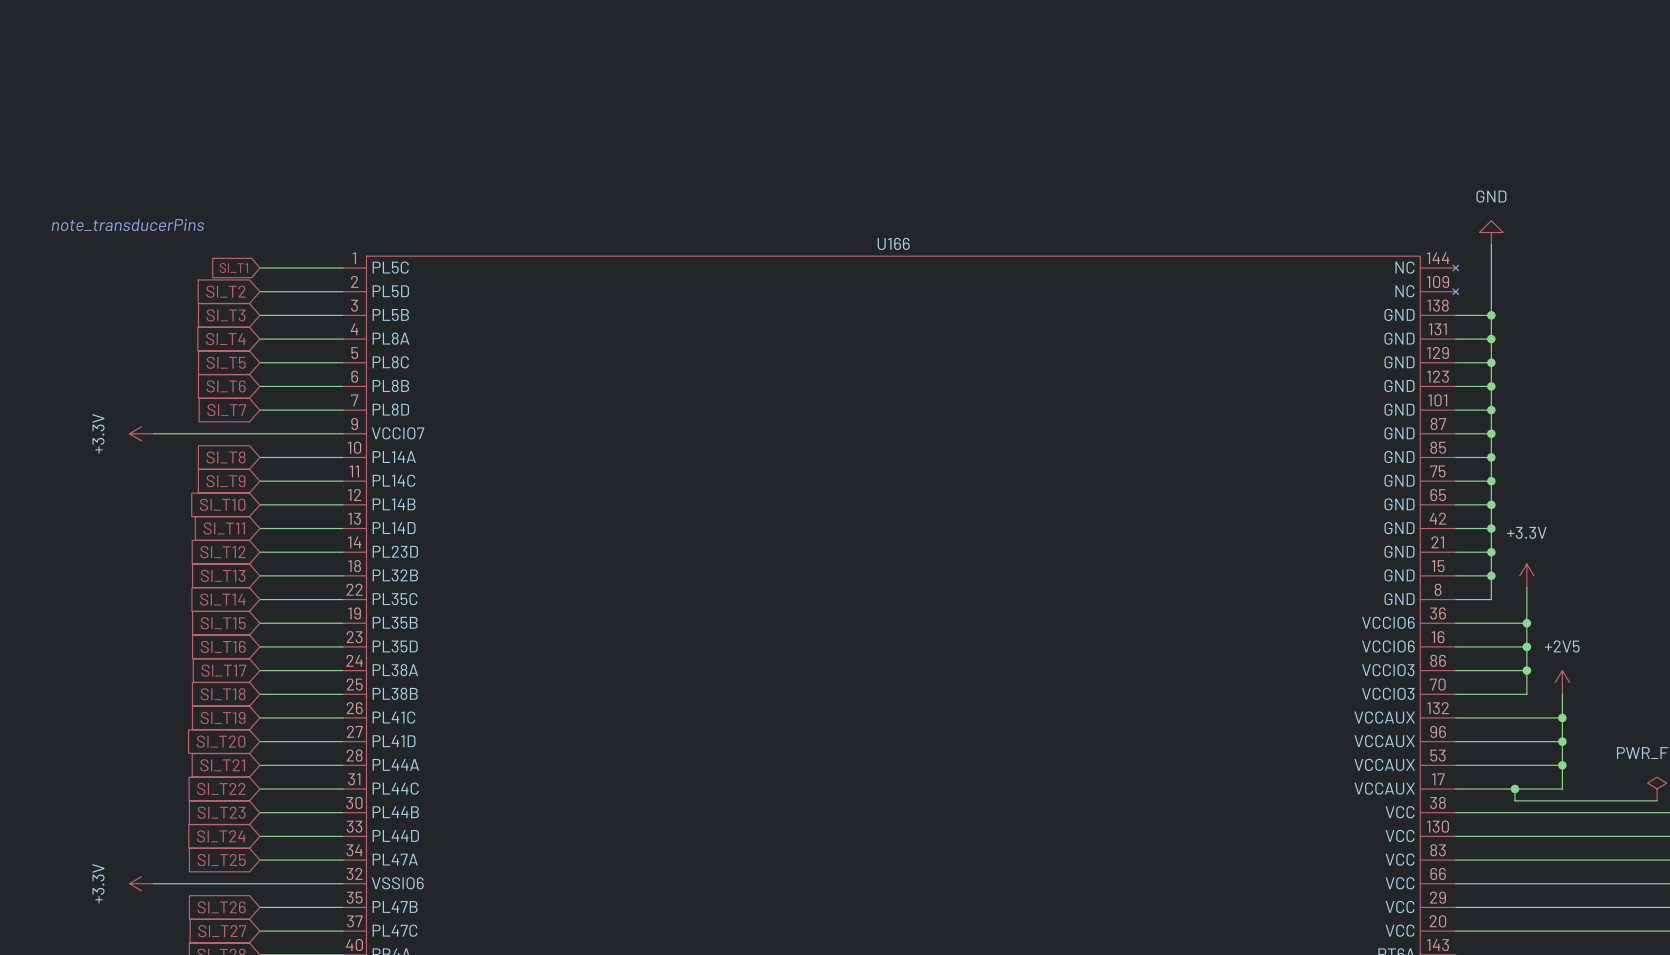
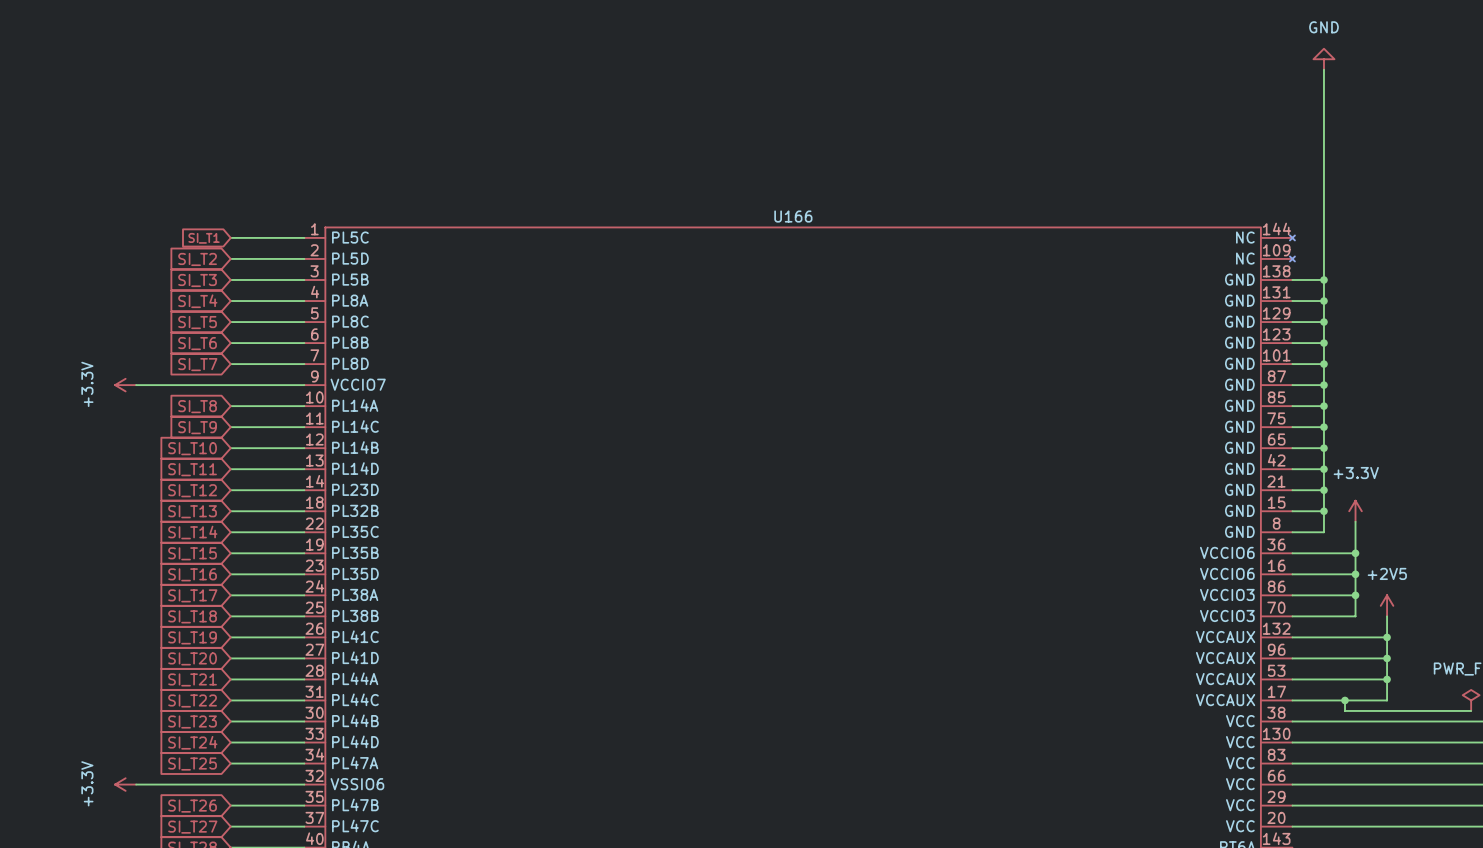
wire: none -> (1323, 69) (1323, 216)
text: note_transducerPins (127, 224) -> none
power symbol position: GND (1491, 232) -> GND (1323, 59)

